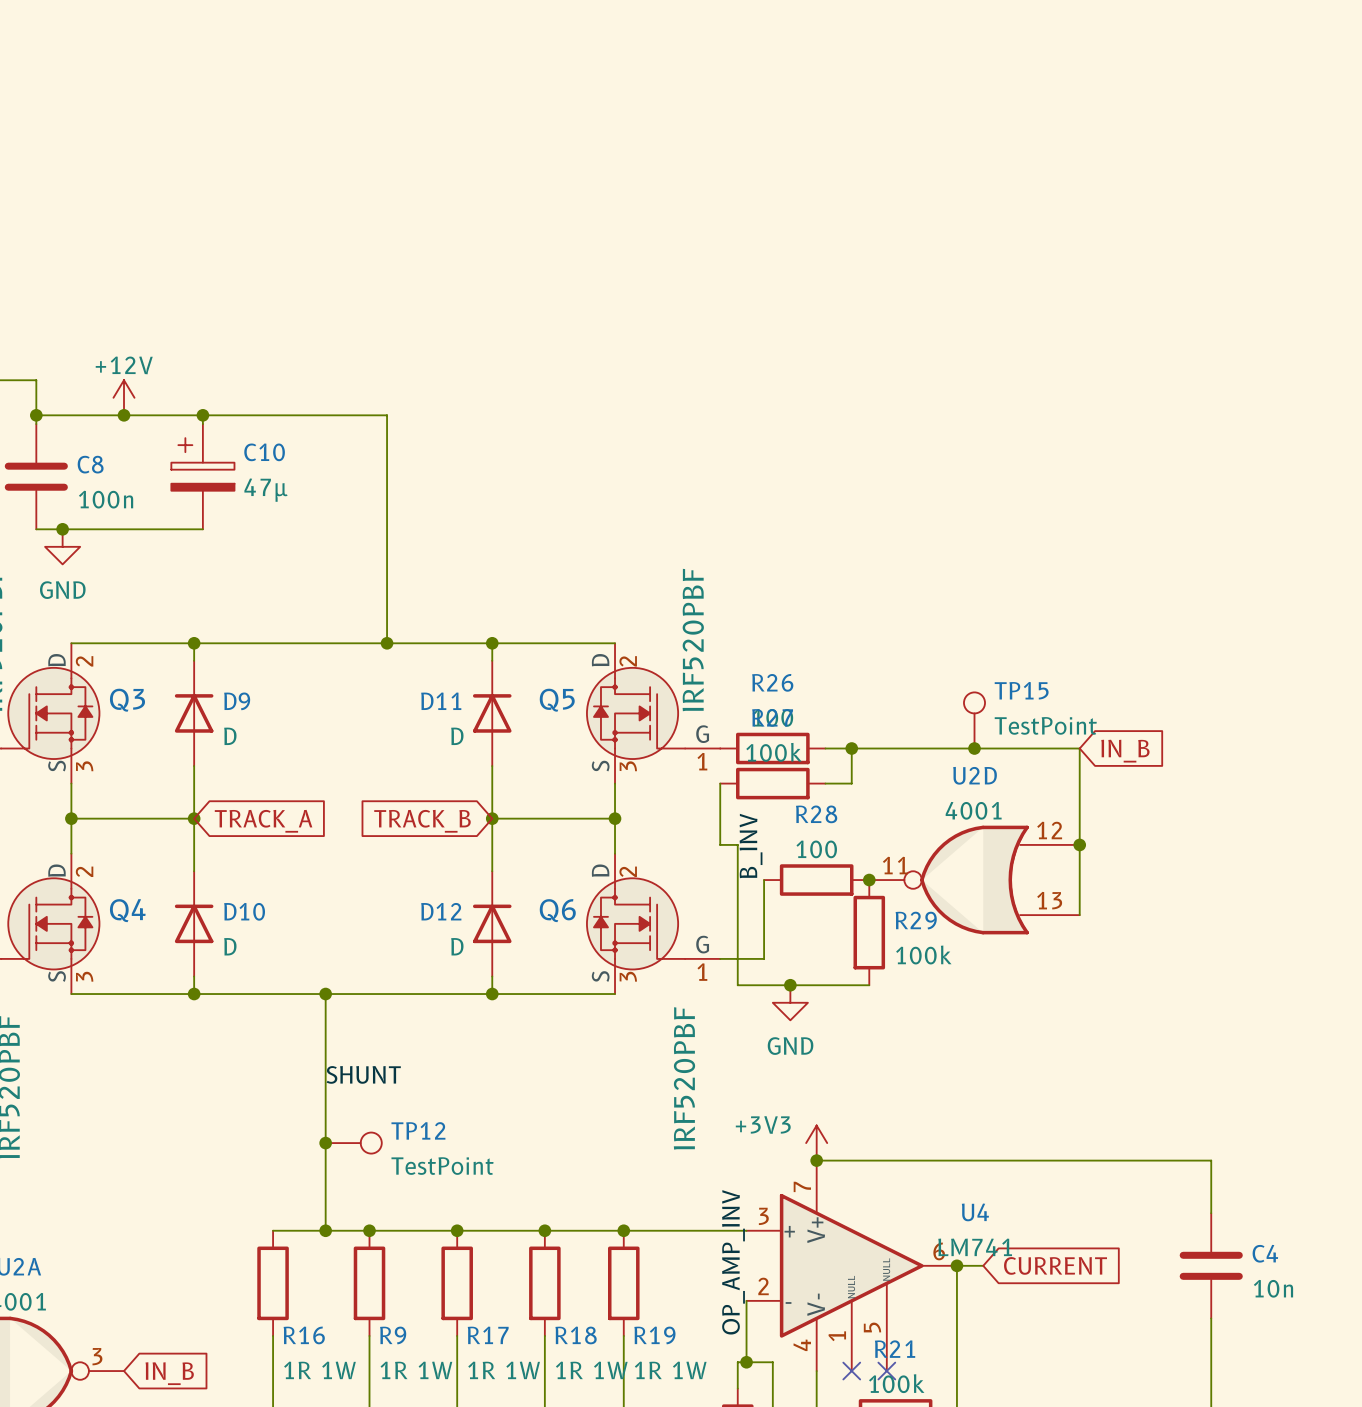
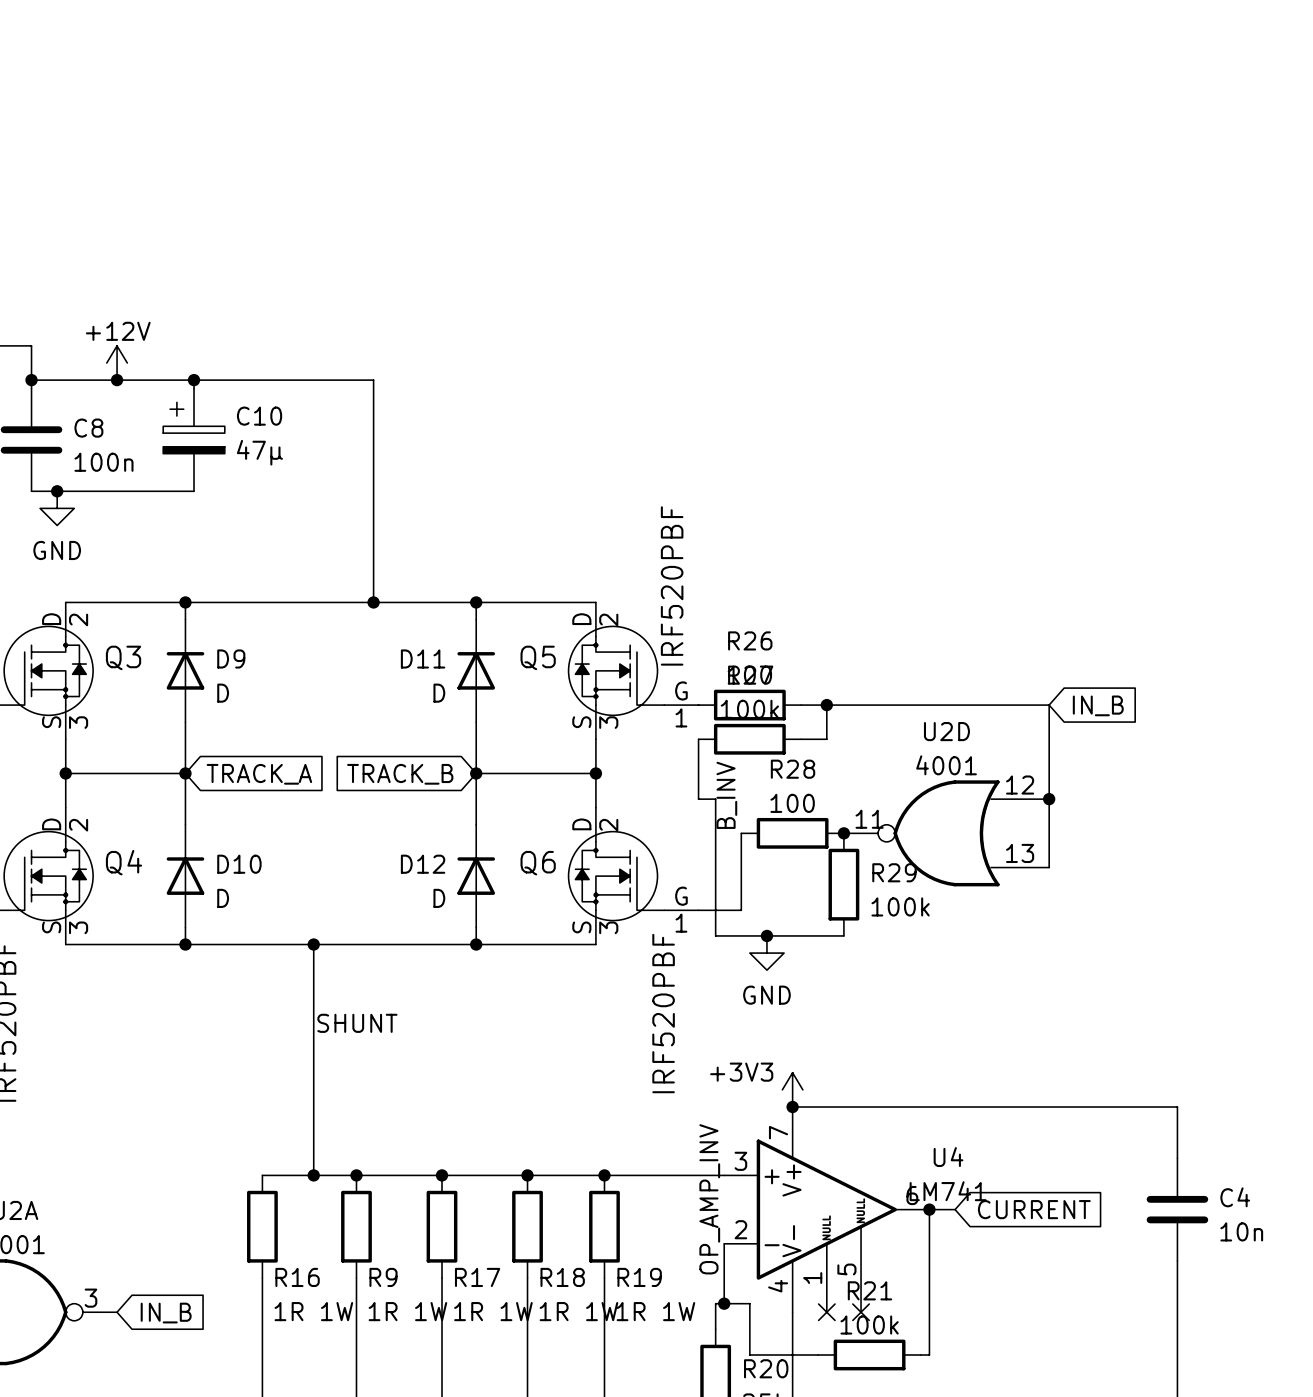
TP15: TestPoint (974, 720) -> none
junction: (974, 748) -> none
junction: (325, 1143) -> none
TP12: TestPoint (353, 1143) -> none

